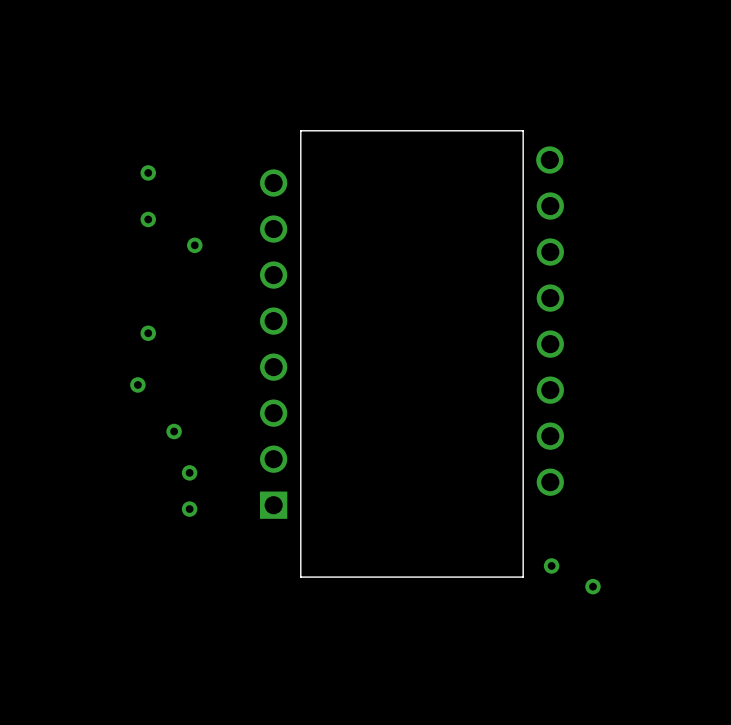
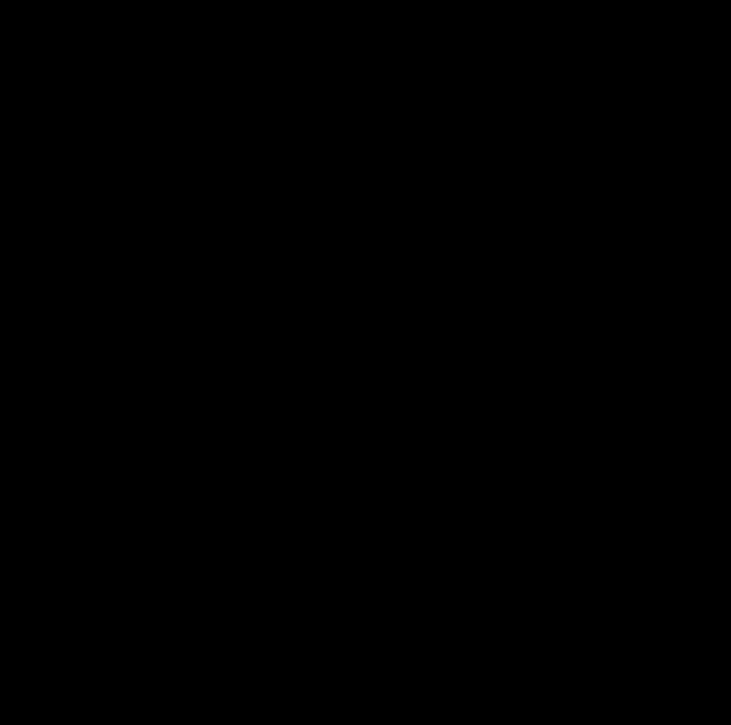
via: (148, 172) -> none
via: (148, 219) -> none
via: (194, 245) -> none
via: (148, 333) -> none
part: (411, 353) -> none
via: (137, 384) -> none
via: (174, 431) -> none
via: (189, 472) -> none
via: (189, 509) -> none
via: (551, 565) -> none
via: (592, 586) -> none

